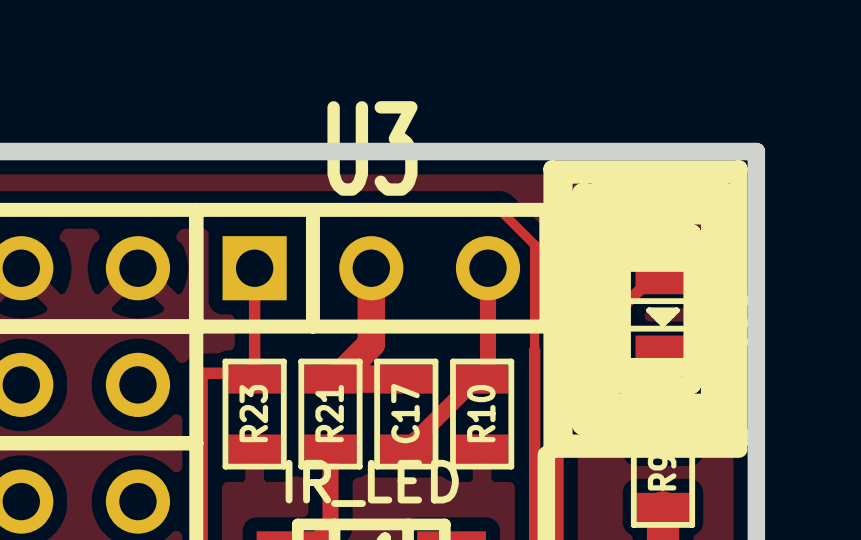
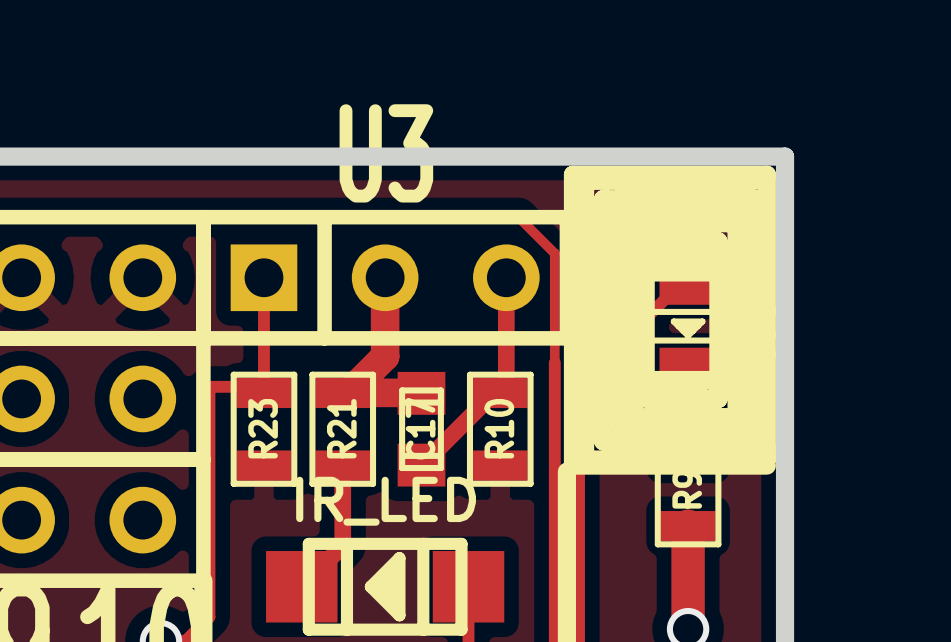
C17 footprint: [374, 358, 439, 470] -> [397, 371, 446, 487]

